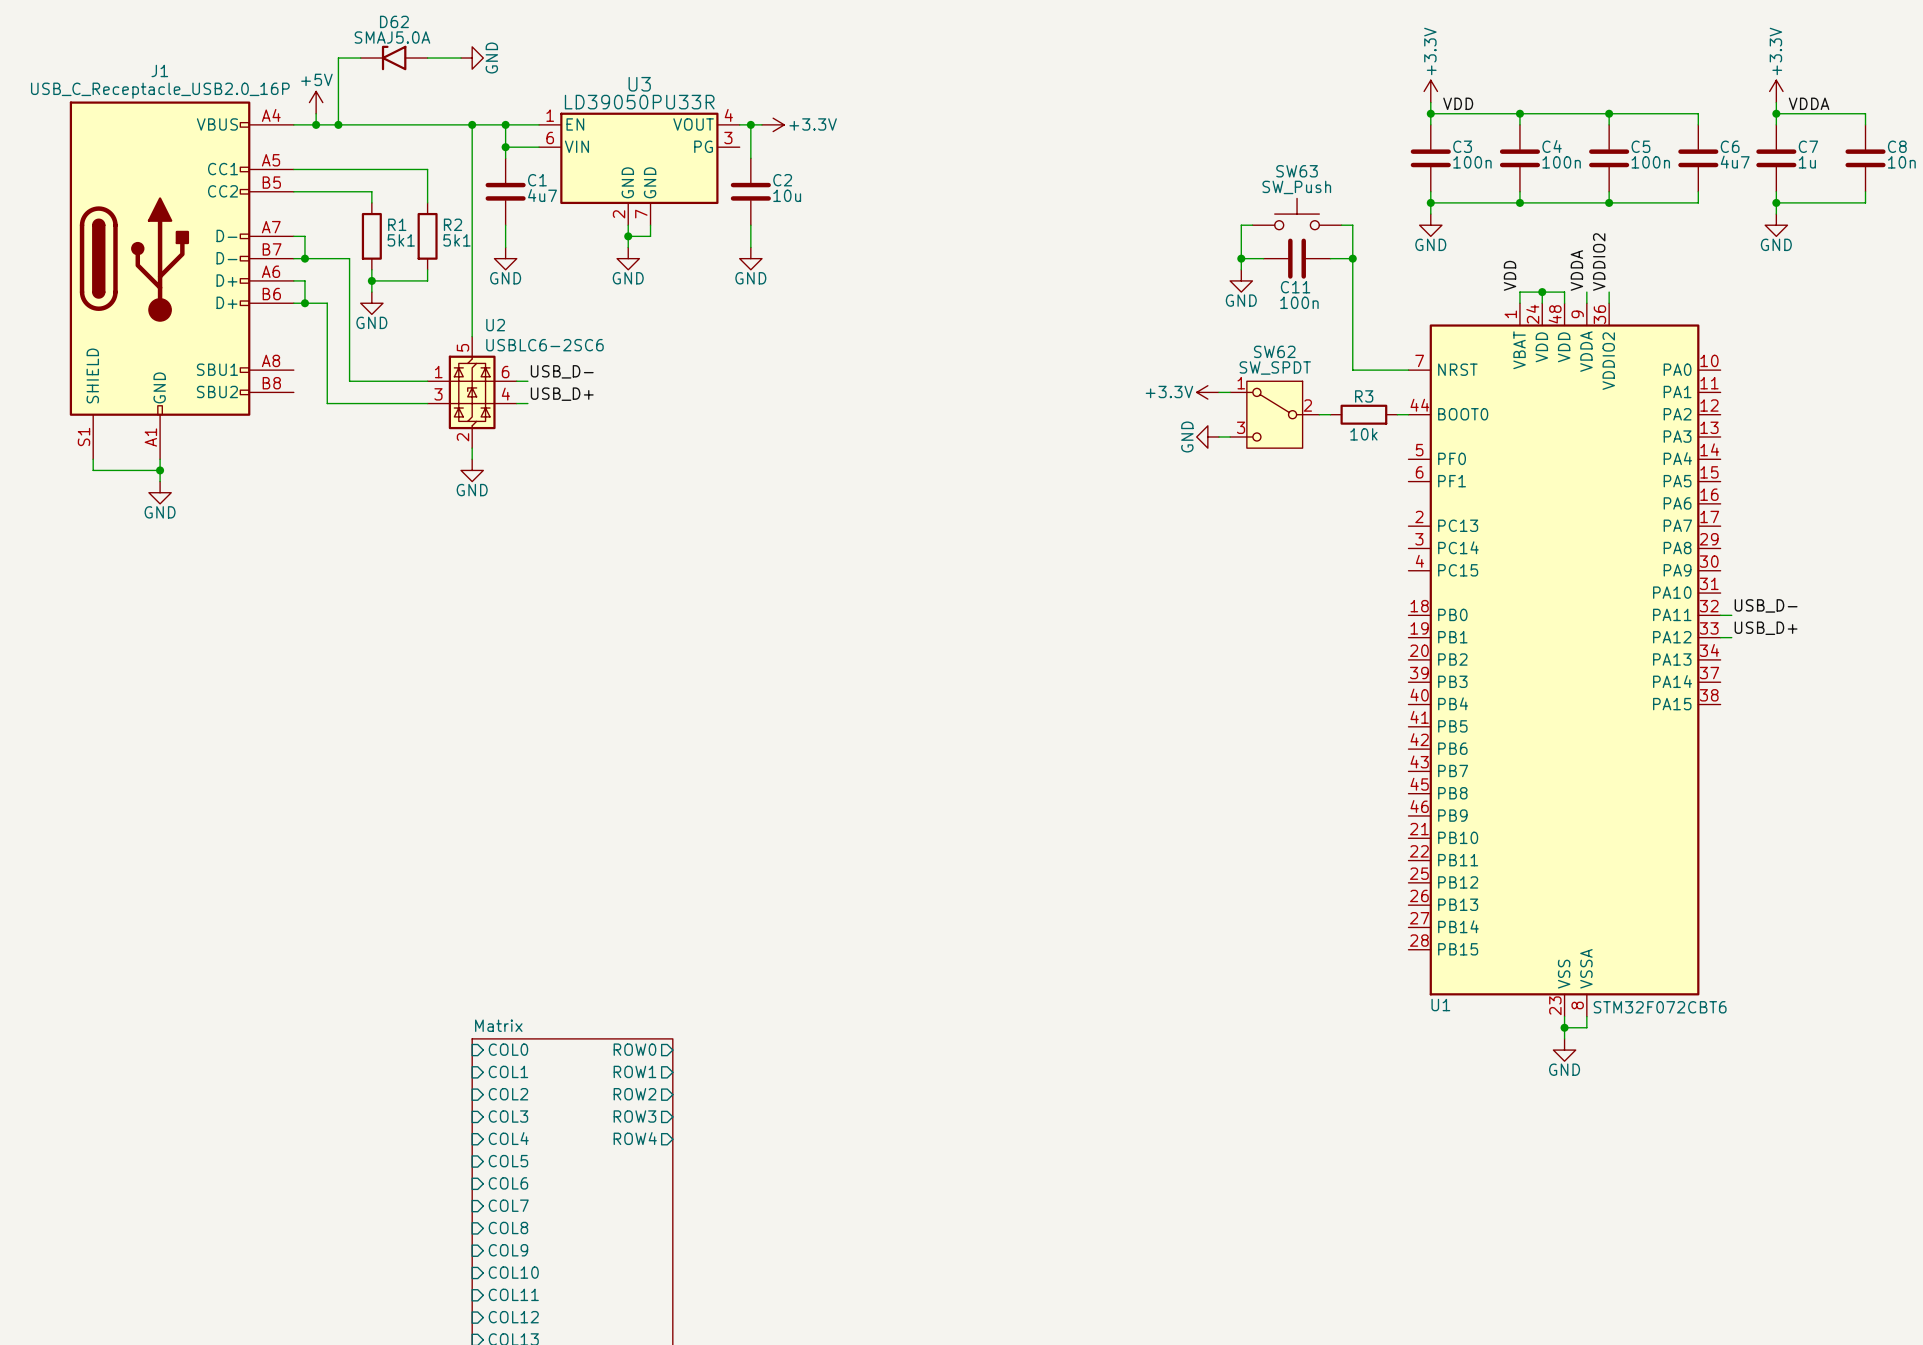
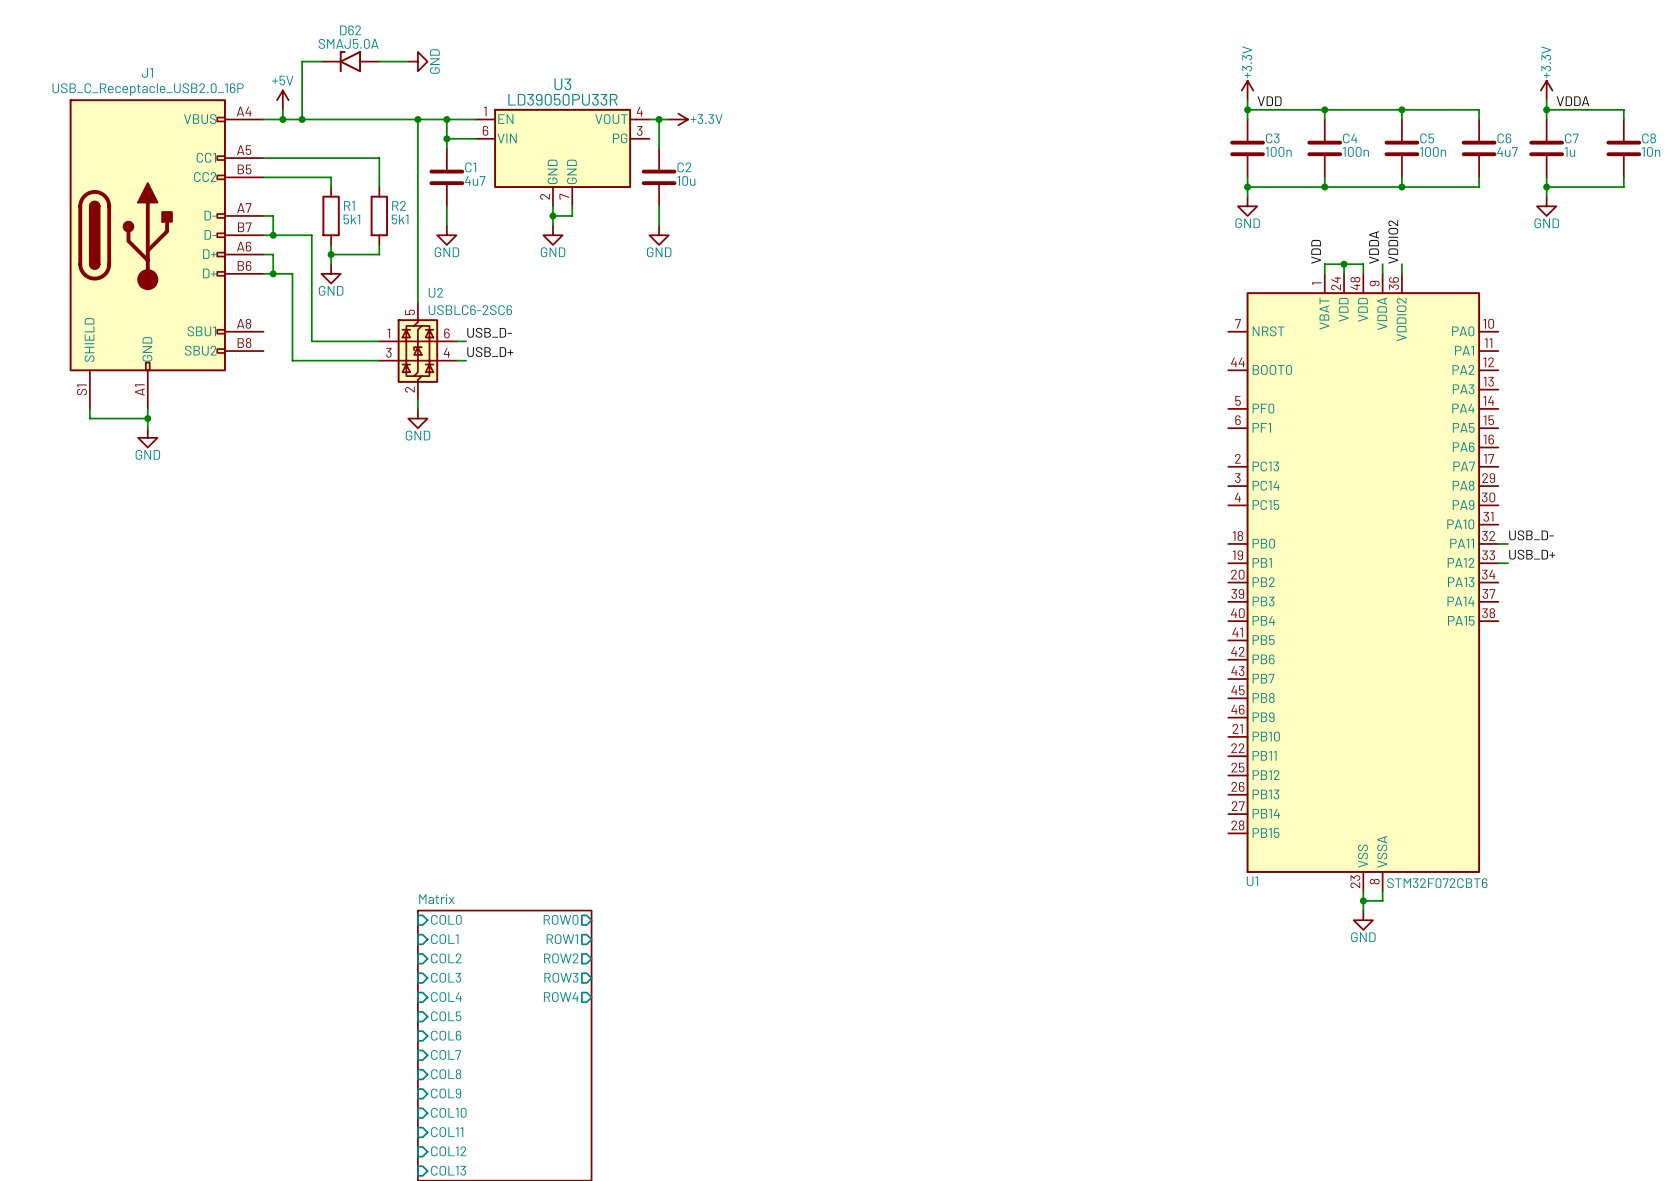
SW63: SW_Push (1297, 214) -> none
wire: (1252, 225) (1241, 225) (1241, 269) -> none
wire: (1341, 225) (1352, 225) (1352, 370) (1408, 370) -> none
wire: (1241, 258) (1263, 258) -> none
junction: (1241, 258) -> none
C11: 100n (1297, 258) -> none
wire: (1330, 258) (1352, 258) -> none
junction: (1352, 258) -> none
power symbol: GND (1241, 280) -> none
power symbol: +3.3V (1207, 392) -> none
wire: (1219, 392) (1230, 392) -> none
SW62: SW_SPDT (1274, 414) -> none
wire: (1319, 414) (1330, 414) -> none
R3: 10k (1363, 414) -> none
wire: (1397, 414) (1408, 414) -> none
power symbol: GND (1207, 436) -> none
wire: (1219, 436) (1230, 436) -> none

